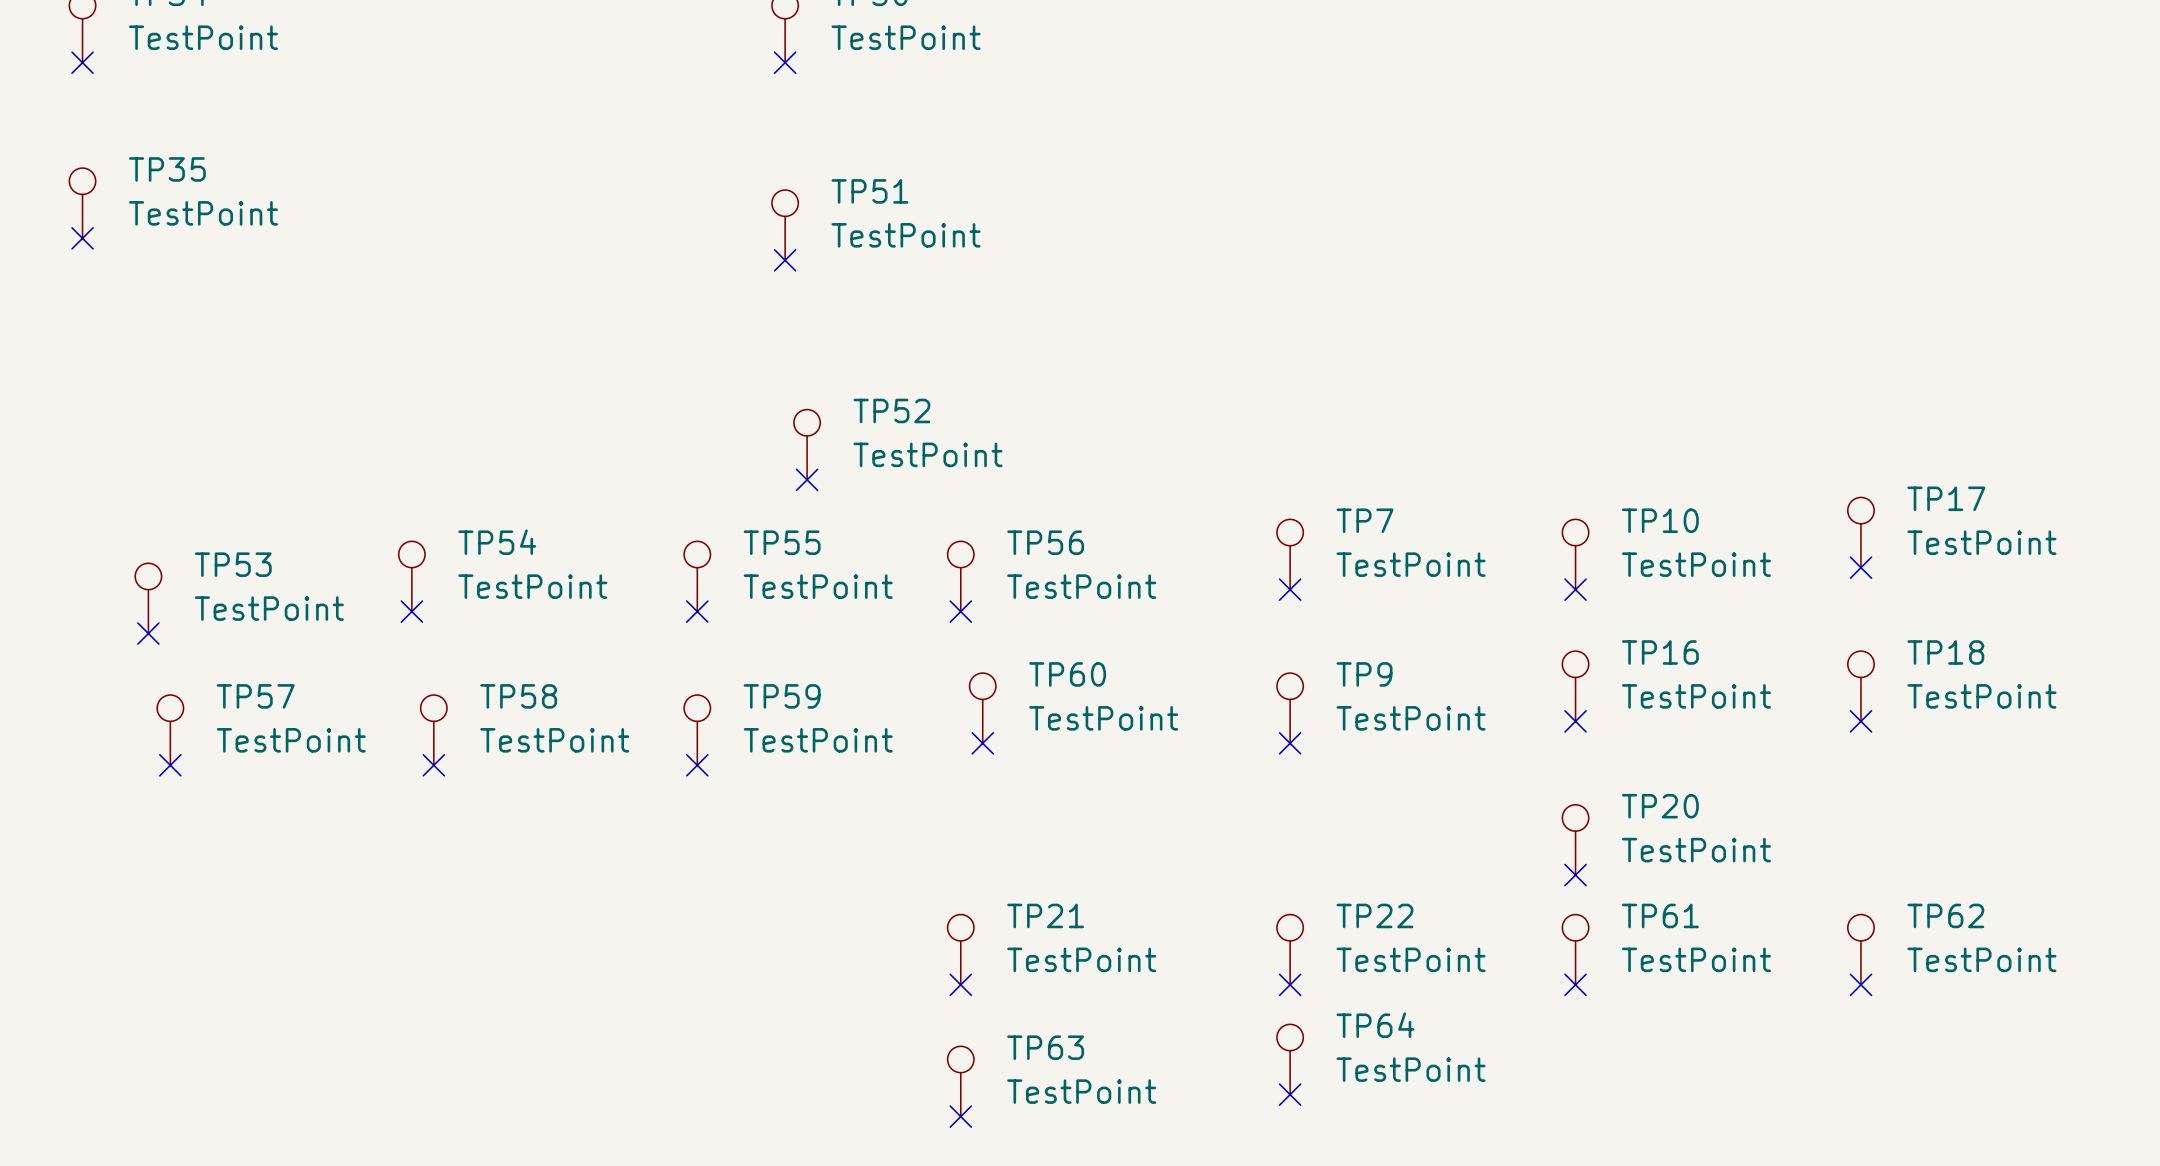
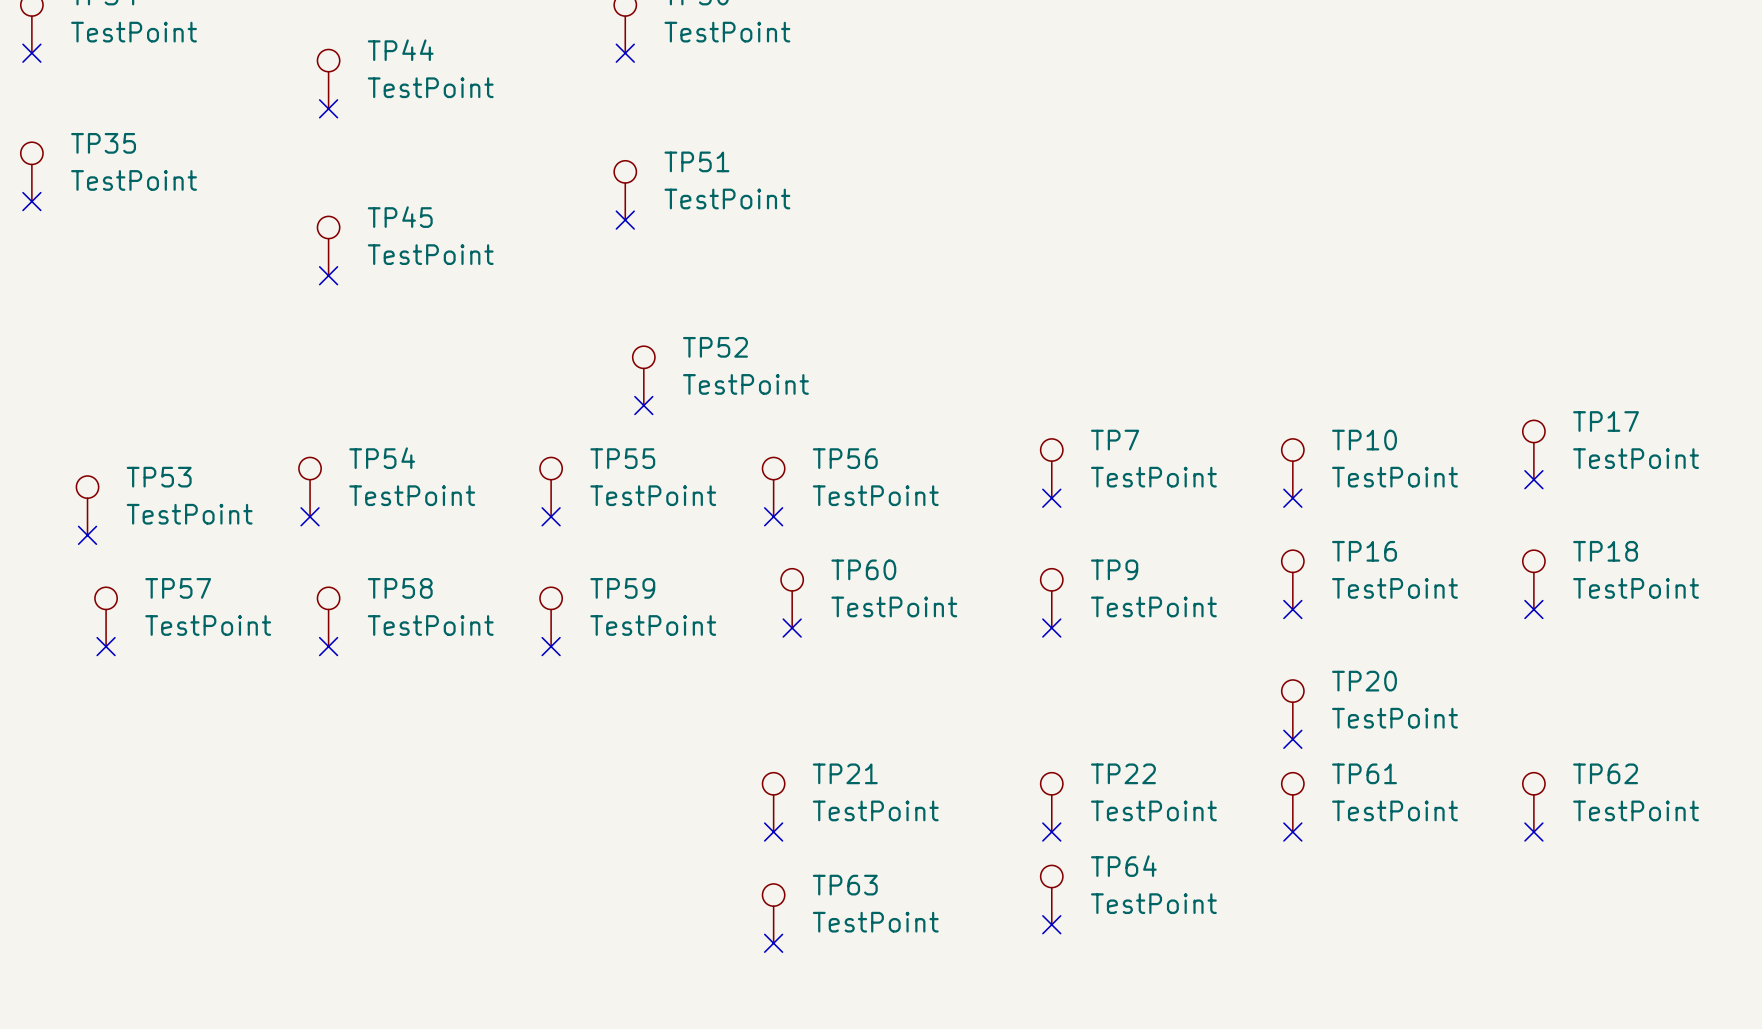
TP44: none -> TestPoint (328, 79)
no-connect mark: none -> (328, 108)
TP45: none -> TestPoint (328, 246)
no-connect mark: none -> (328, 275)

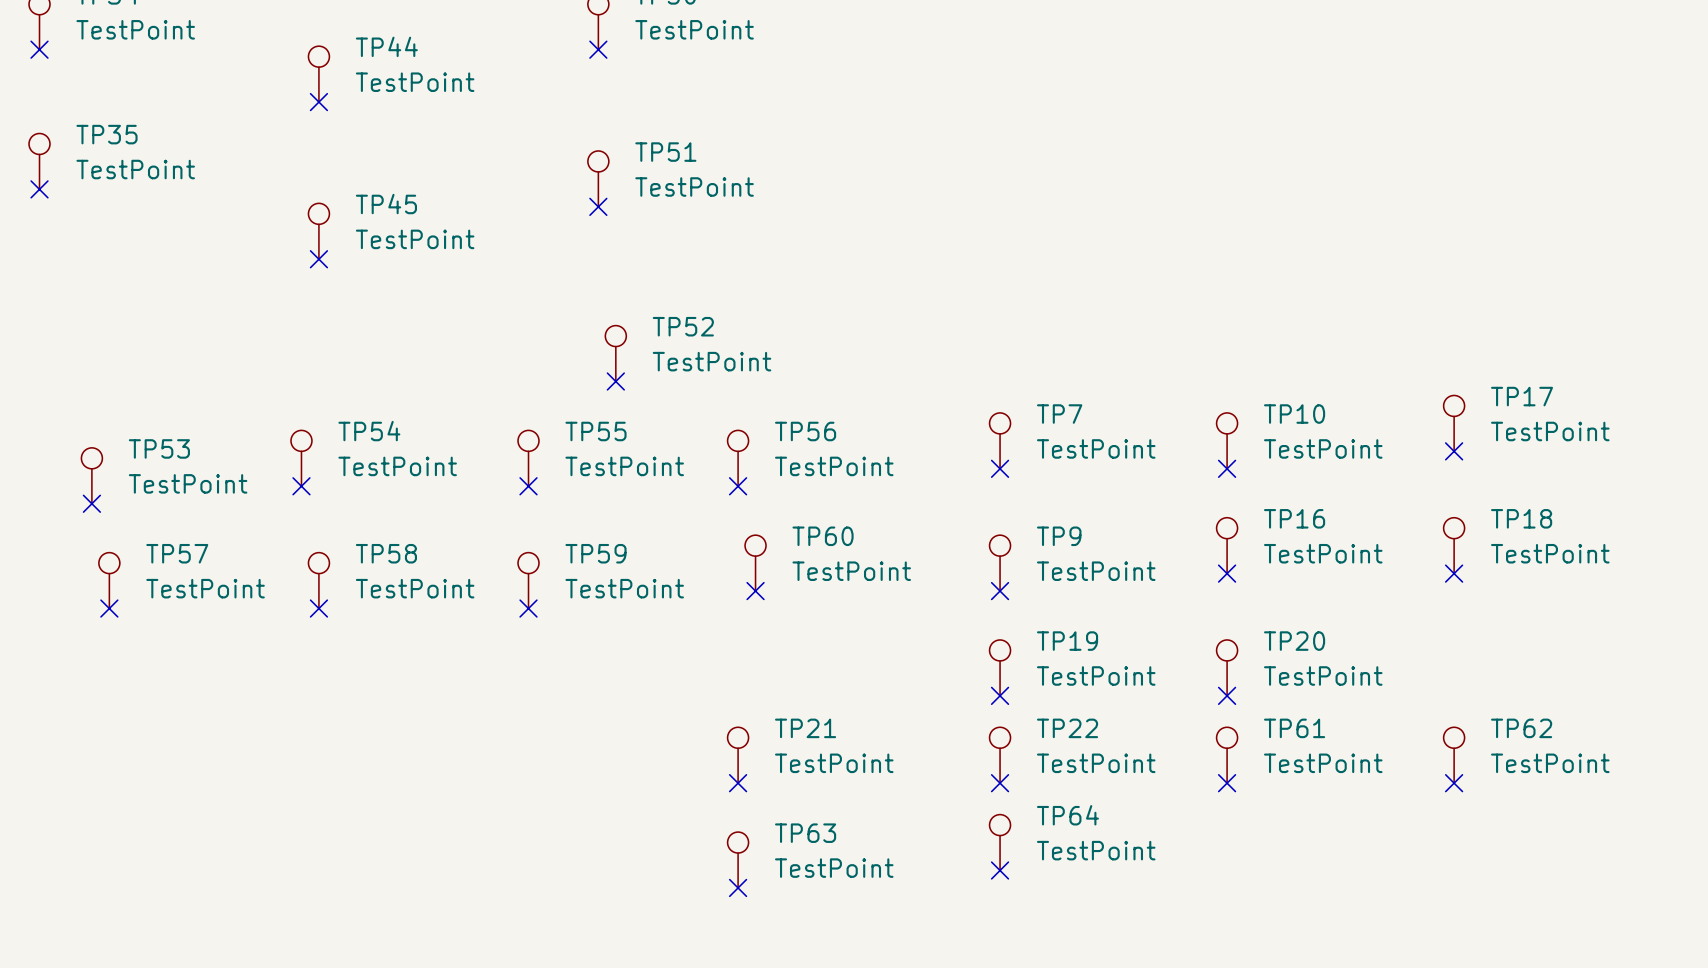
TP19: none -> TestPoint (1000, 667)
no-connect mark: none -> (1000, 695)

